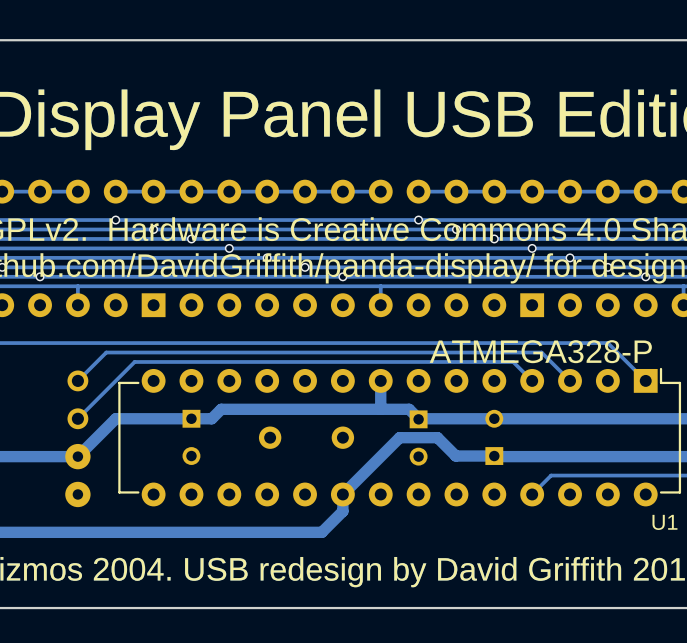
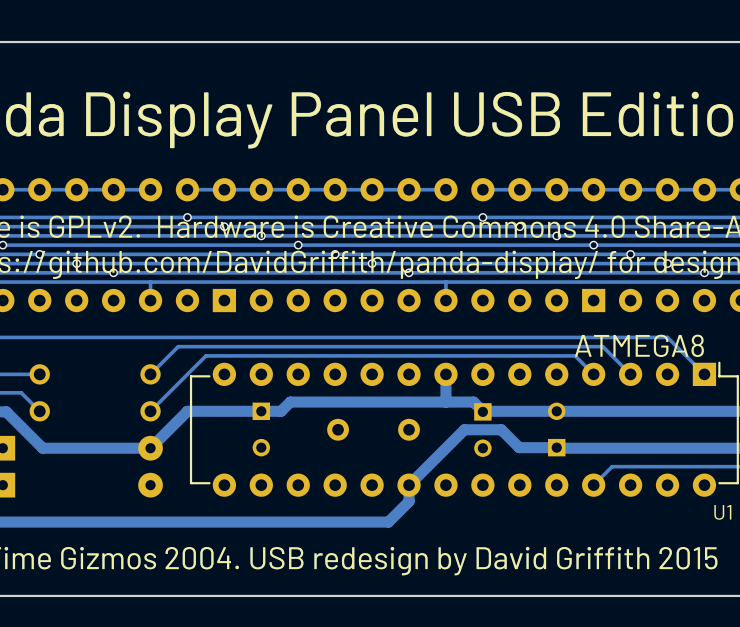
U1 value: ATMEGA328-P (540, 351) -> ATMEGA8 (639, 345)

